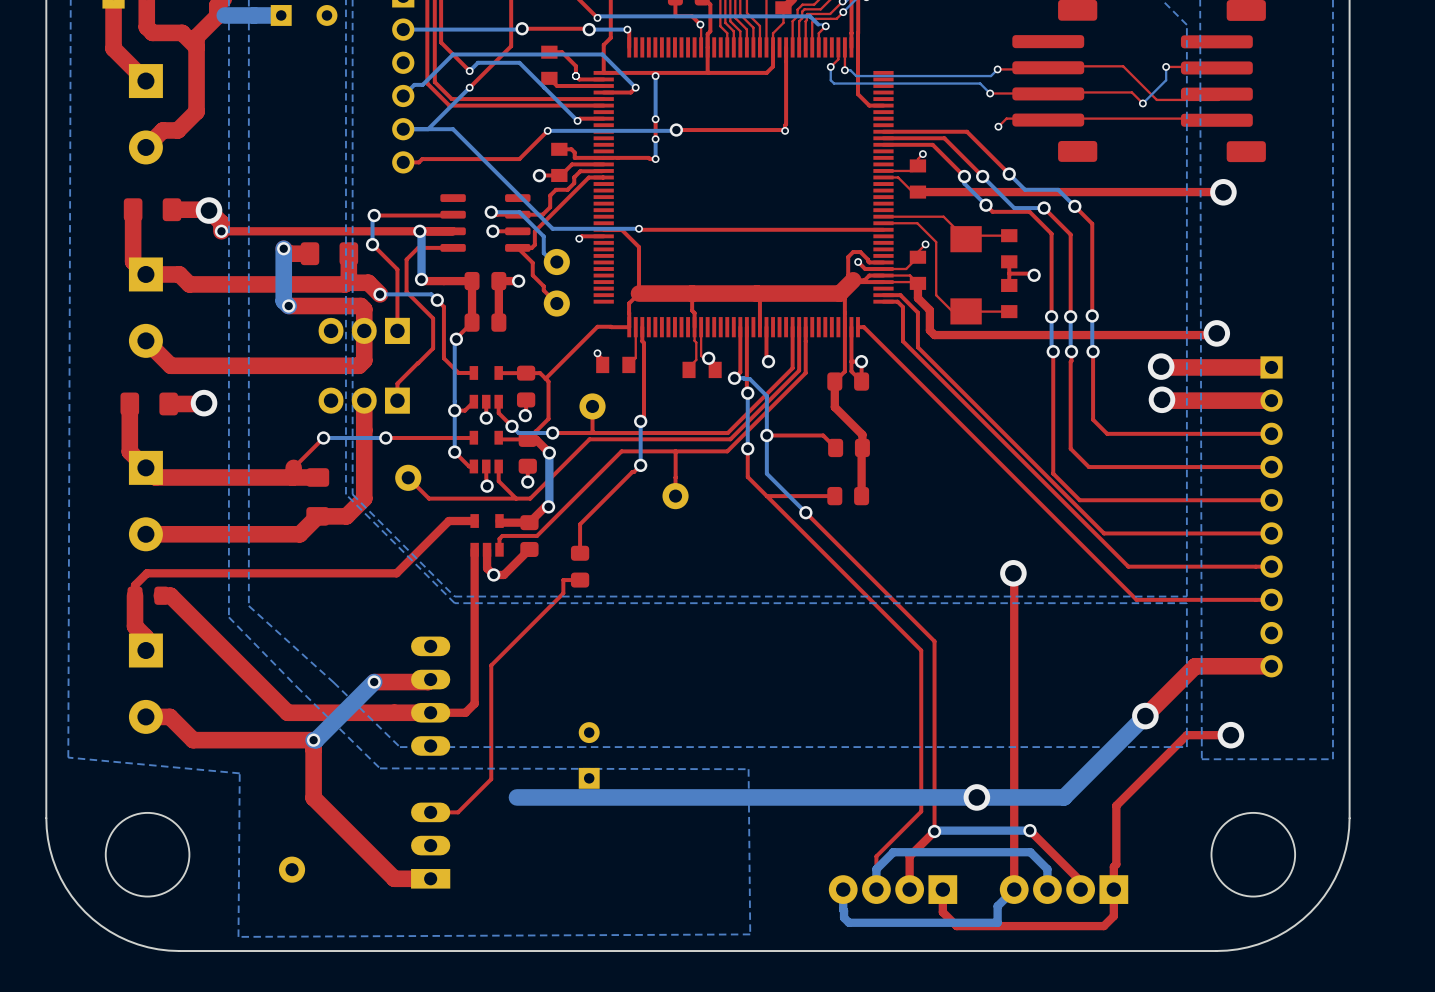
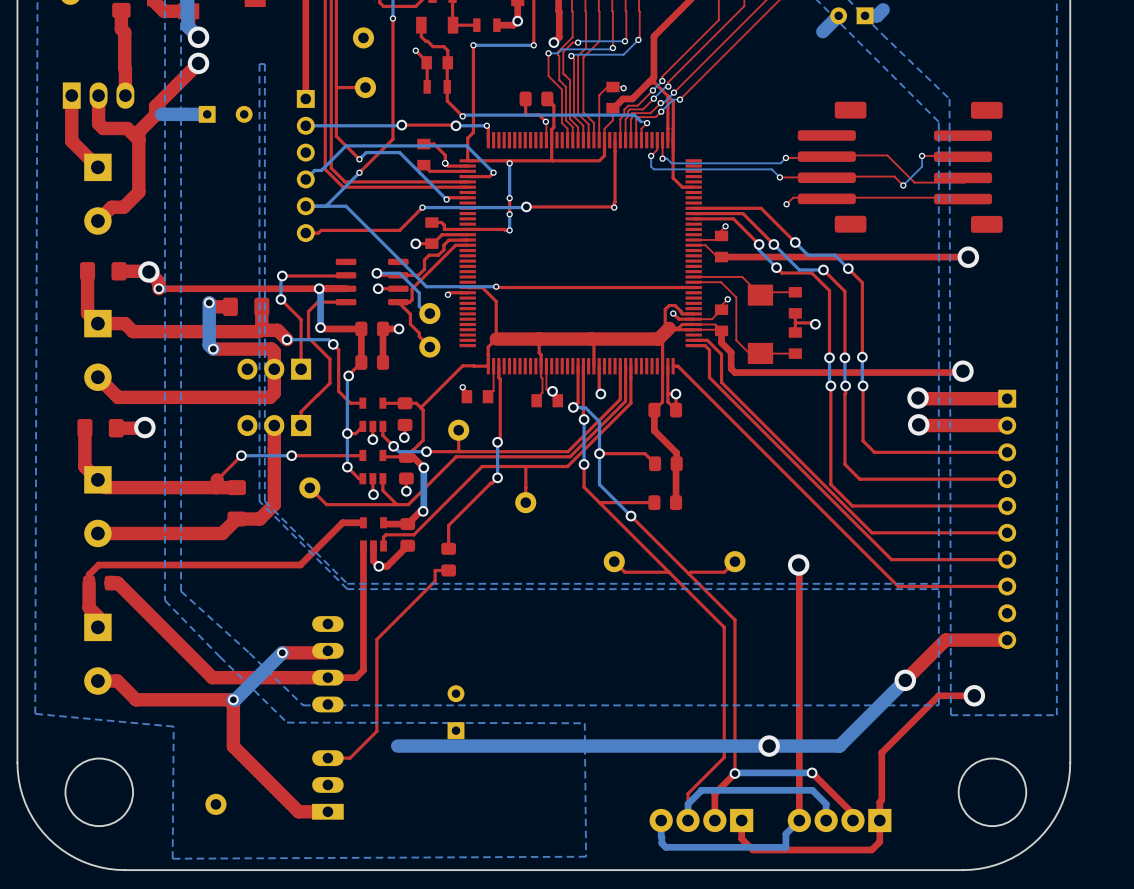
top track: none -> (614, 561) (624, 572) (669, 572)
part: none -> (614, 561)
top track: none -> (734, 561) (724, 572) (690, 572) (689, 574)
part: none -> (734, 561)

